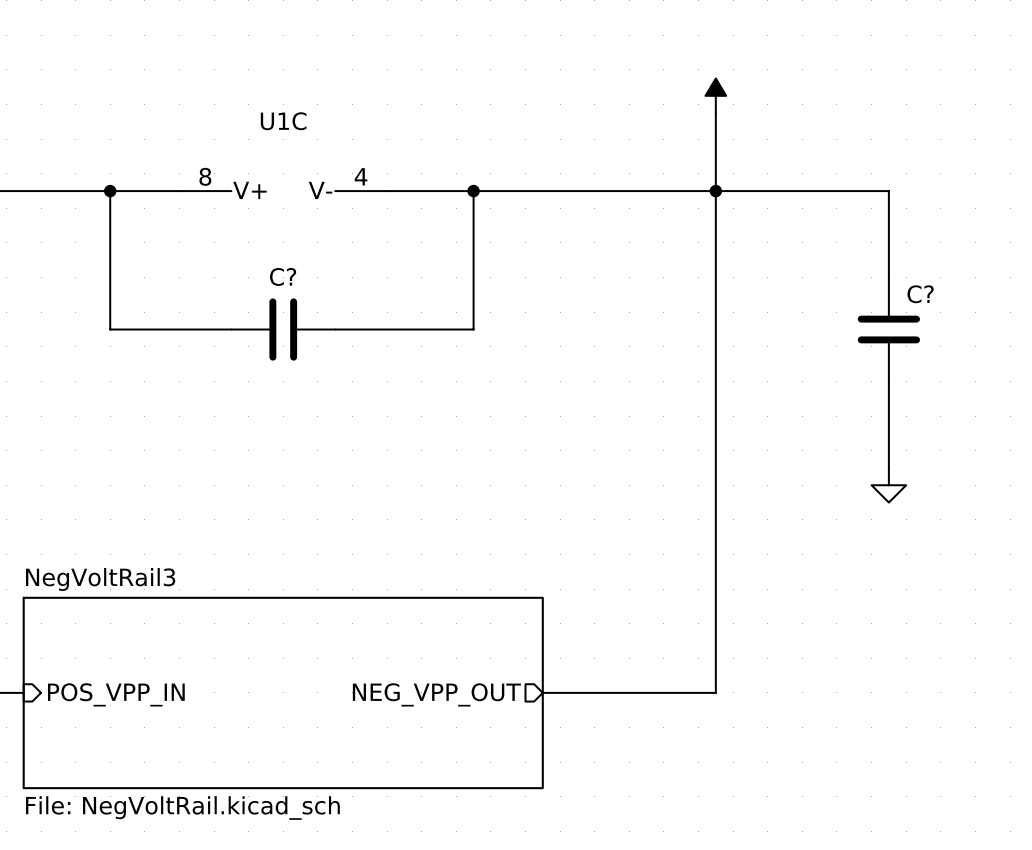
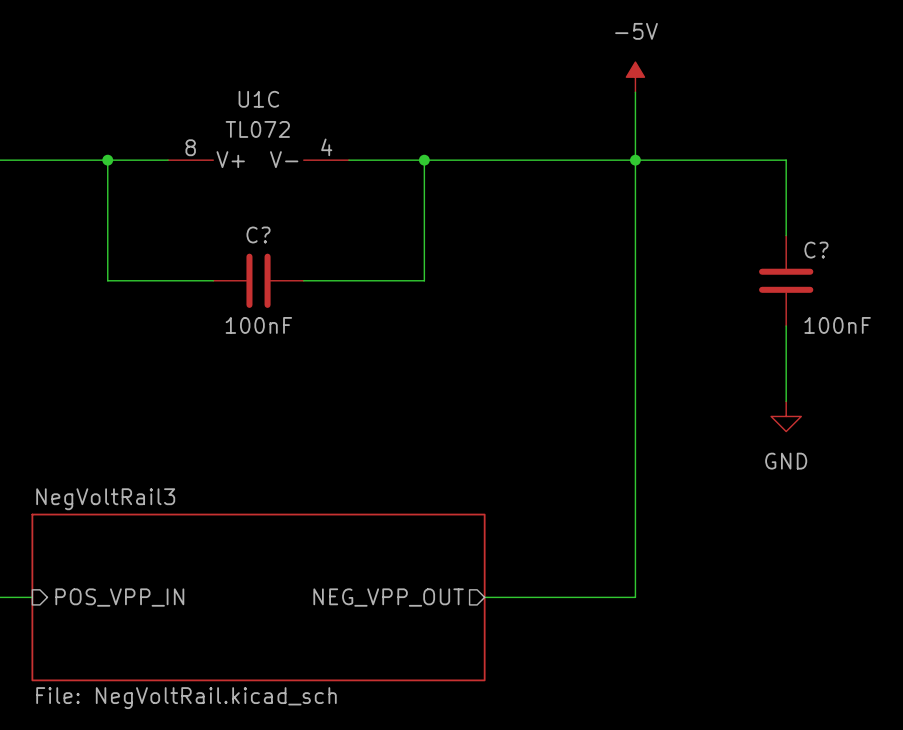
power symbol text: none -> -5V (636, 31)
U1C value: none -> TL072 (257, 129)
C? value: none -> 100nF (258, 325)
C? value: none -> 100nF (837, 325)
power symbol text: none -> GND (786, 461)

